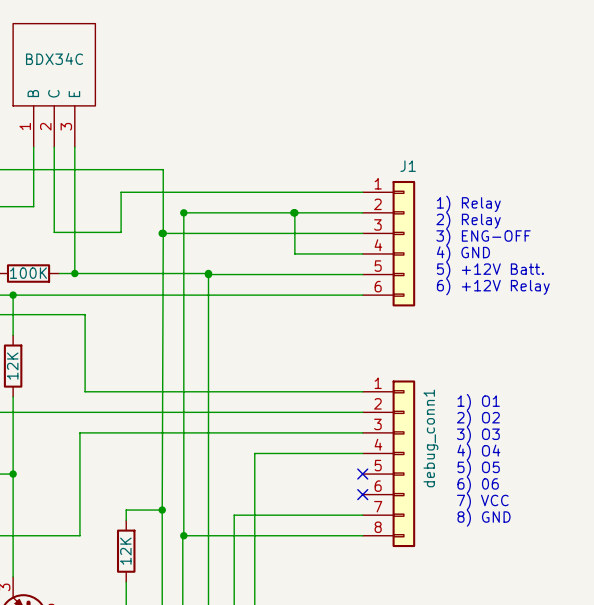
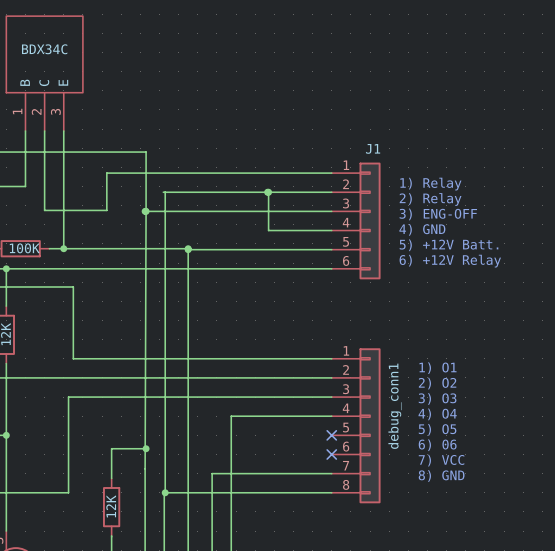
junction: (183, 212) -> none
wire: (126, 510) (162, 510) -> (111, 468) (111, 448) (146, 448)
junction position: (162, 510) -> (146, 448)

